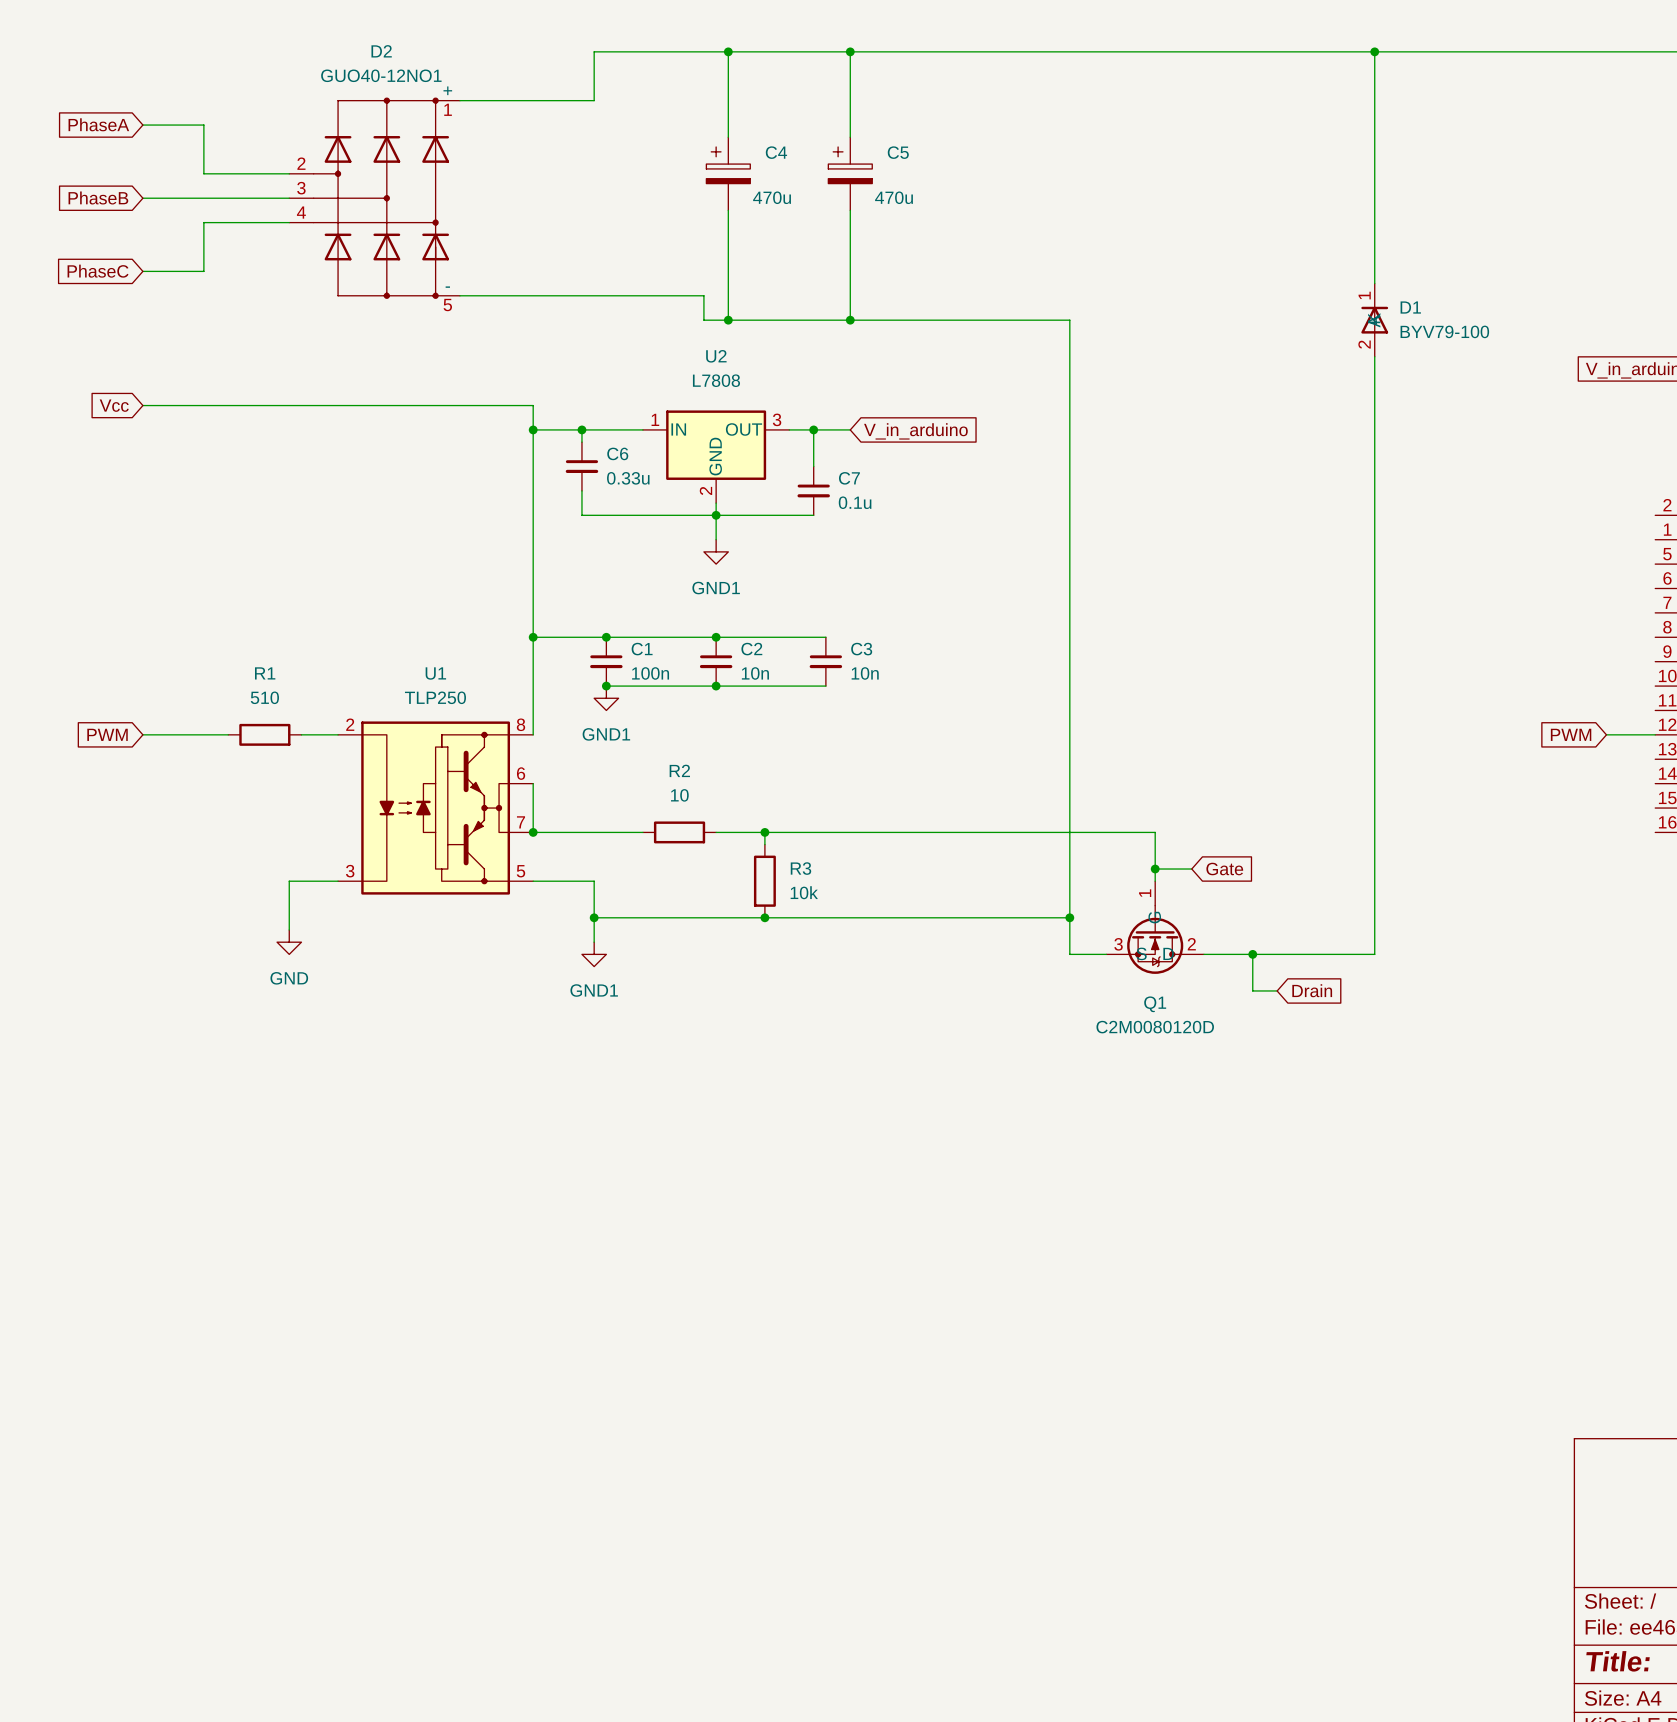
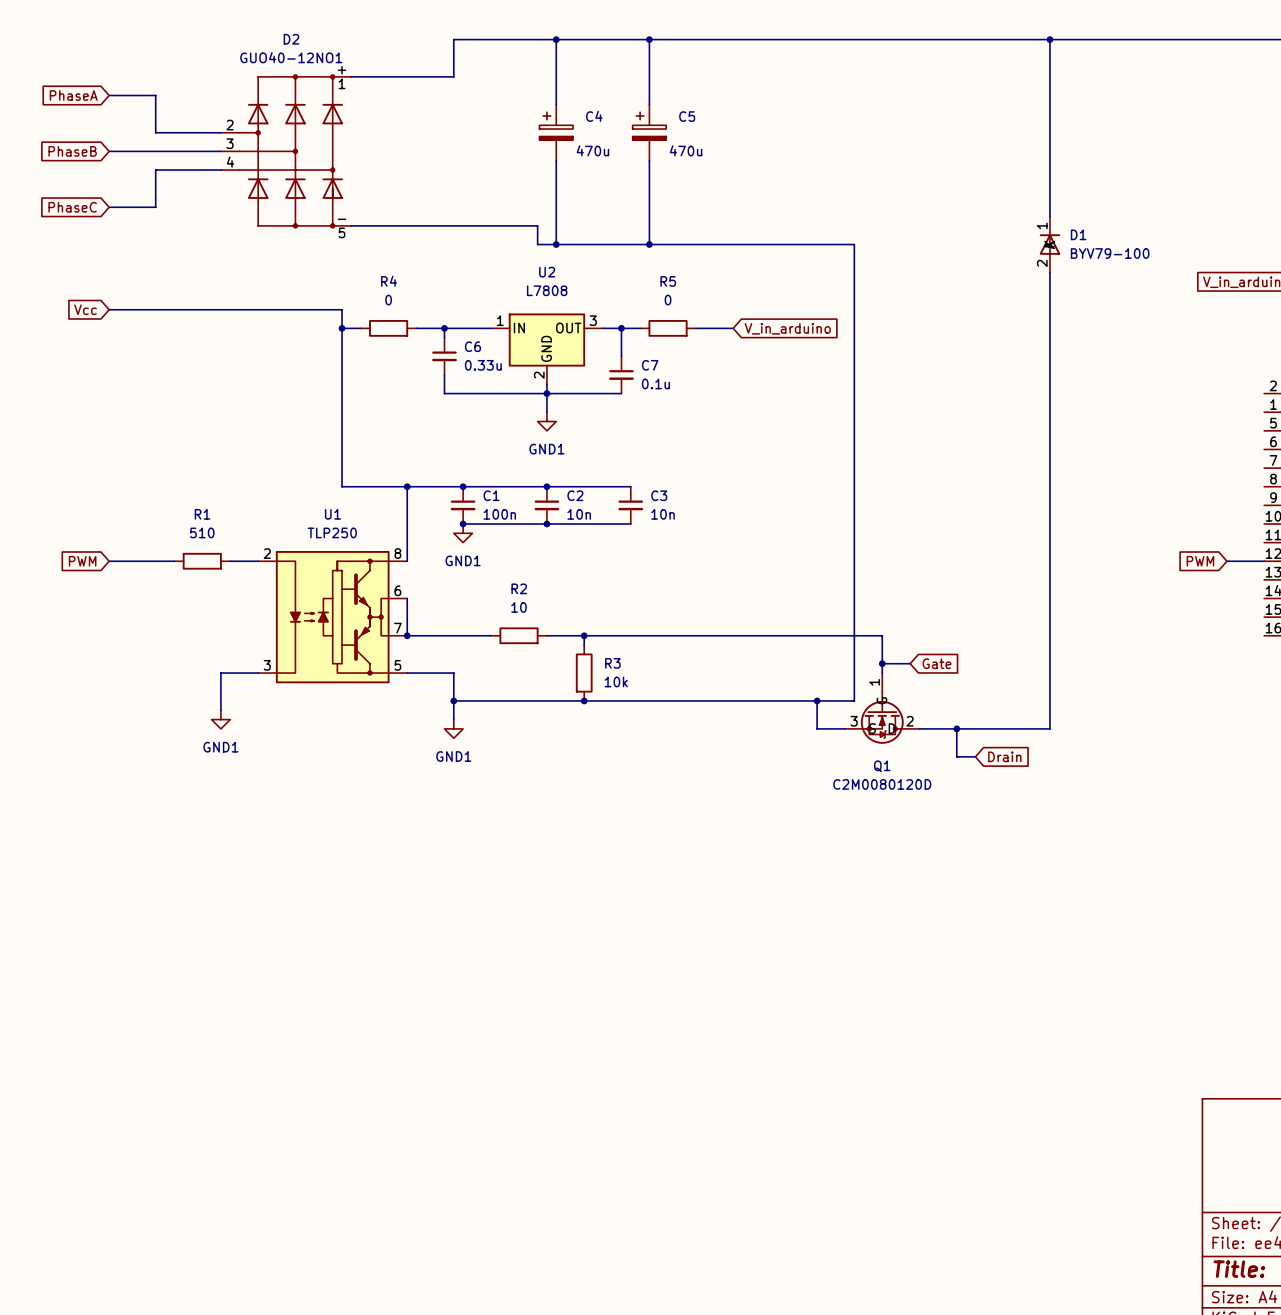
wire: (1069, 320) (1069, 917) -> (817, 244) (854, 244) (854, 700) (817, 700)
wire: (447, 405) (533, 405) (533, 637) -> (342, 309) (342, 486) (407, 486)
wire: none -> (342, 328) (360, 328)
junction: none -> (342, 328)
R4: none -> 0 (388, 328)
junction: (533, 429) -> none
R5: none -> 0 (668, 328)
wire: none -> (695, 328) (733, 328)
global label position: V_in_arduino (915, 431) -> V_in_arduino (787, 328)
power symbol: GND (289, 942) -> GND1 (220, 719)

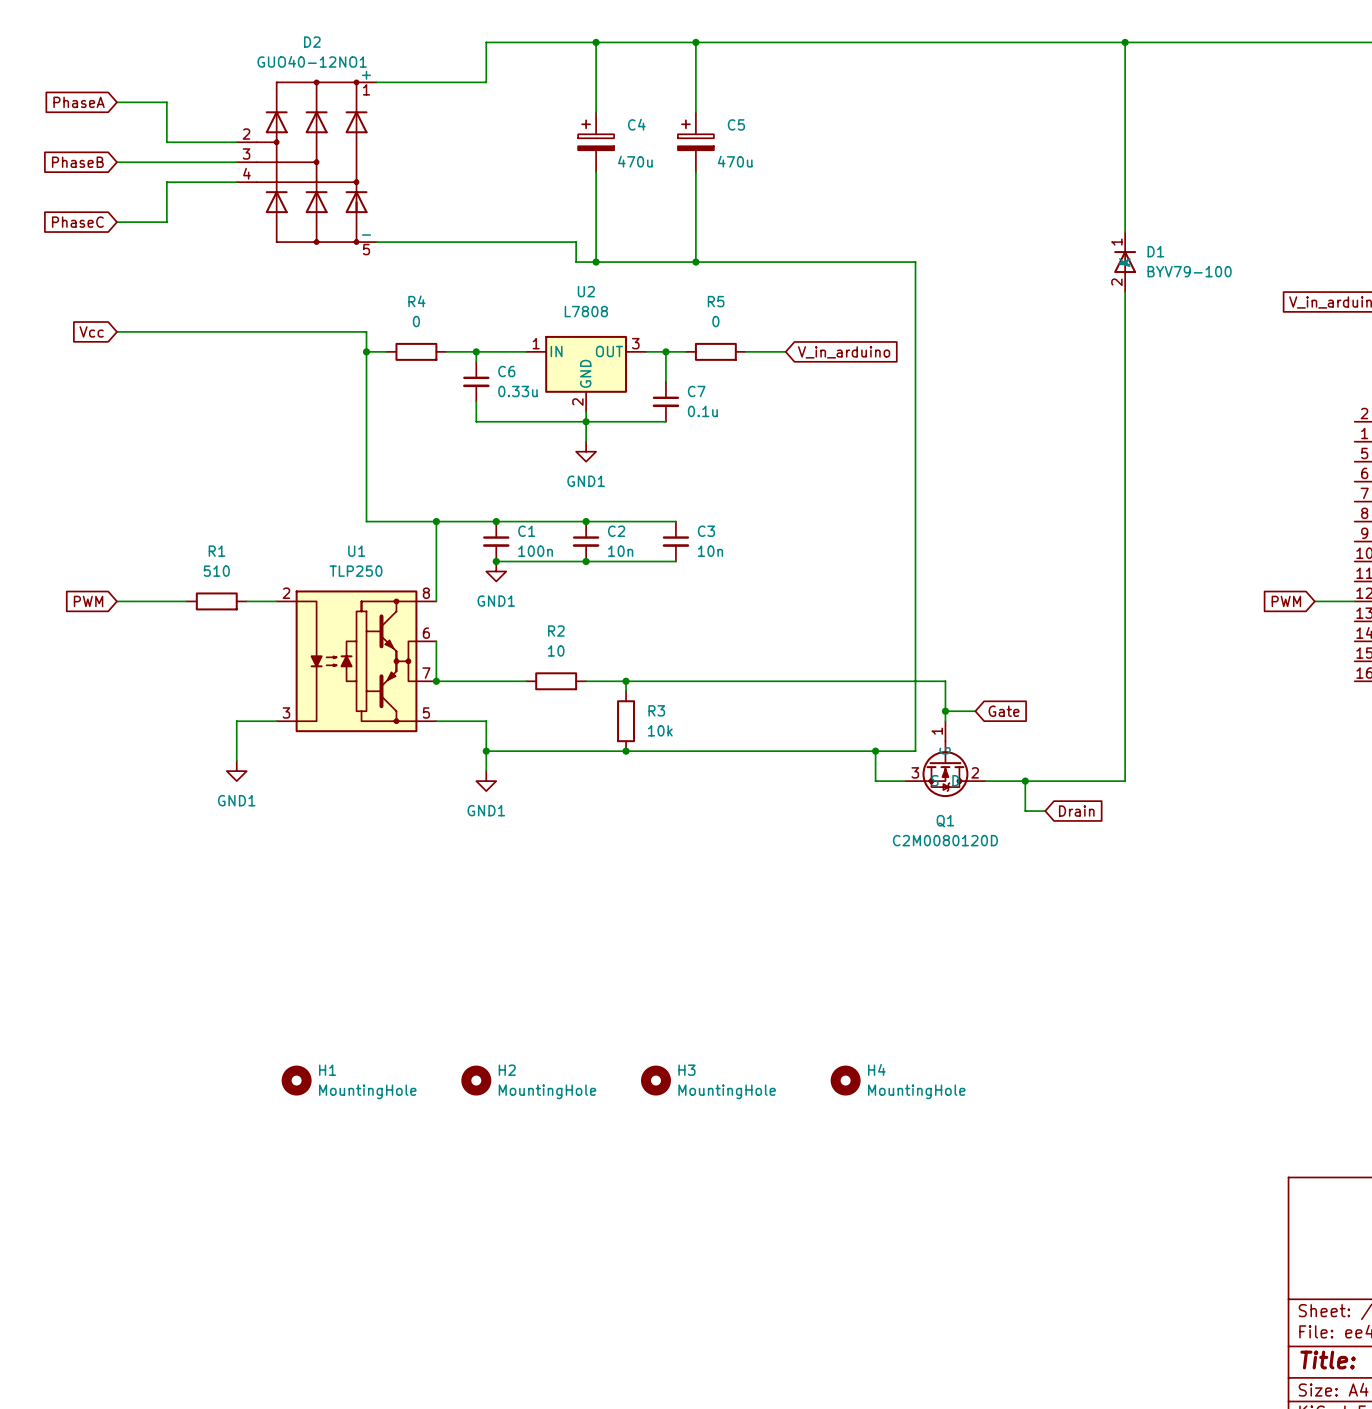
H1: none -> MountingHole (296, 1080)
H2: none -> MountingHole (476, 1080)
H3: none -> MountingHole (655, 1080)
H4: none -> MountingHole (845, 1080)

